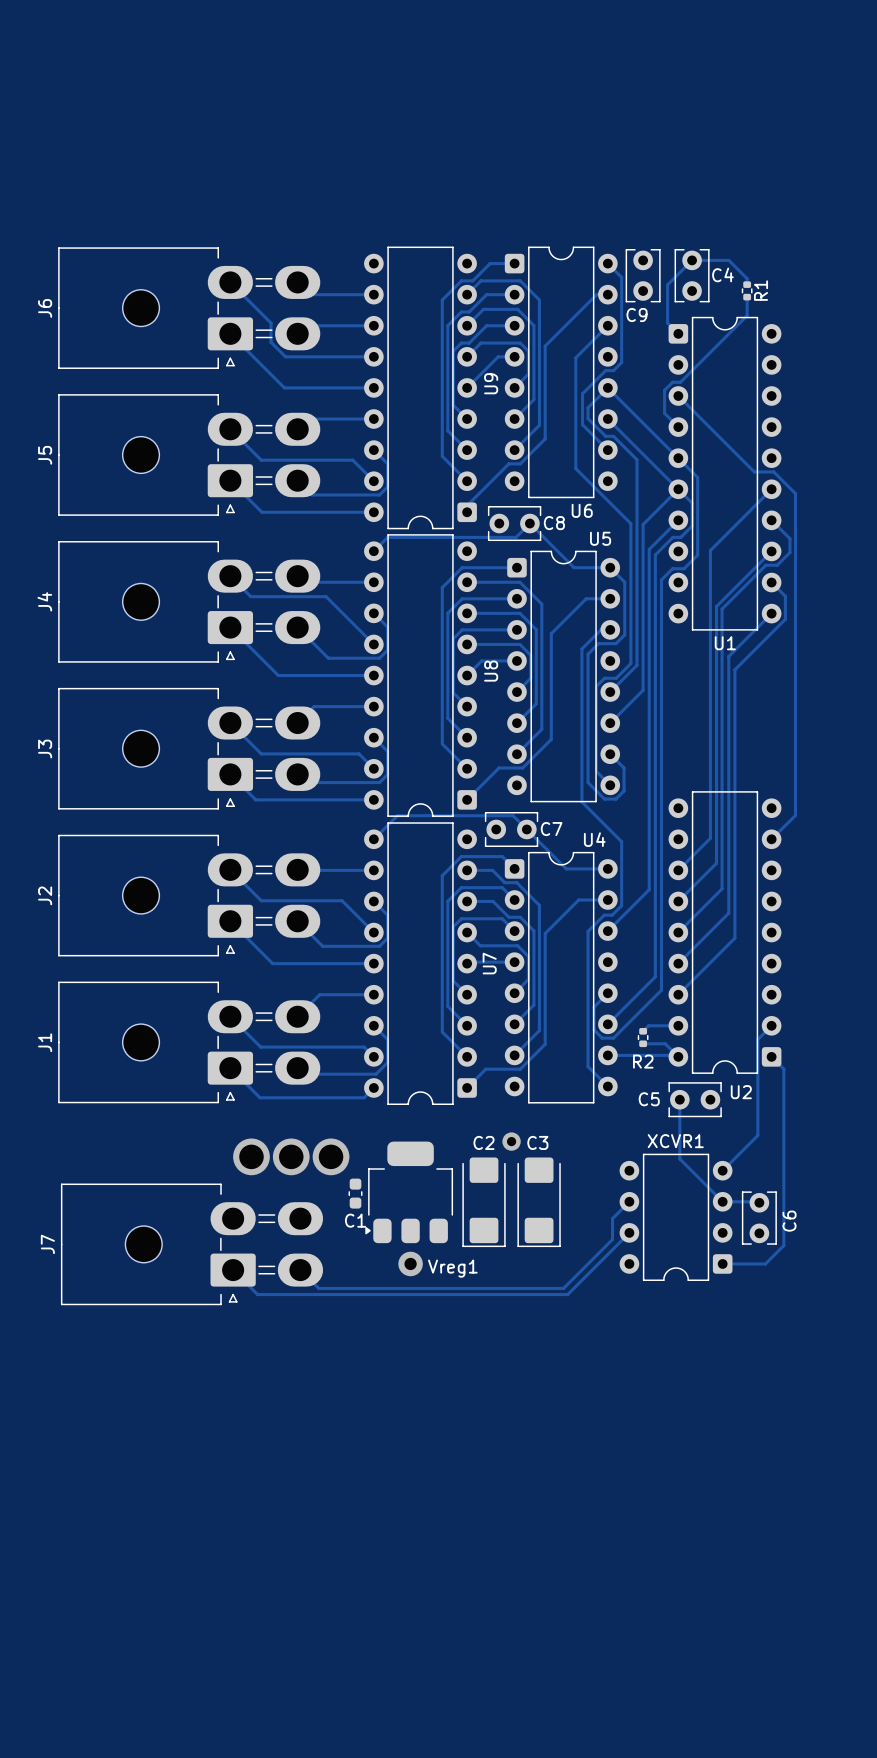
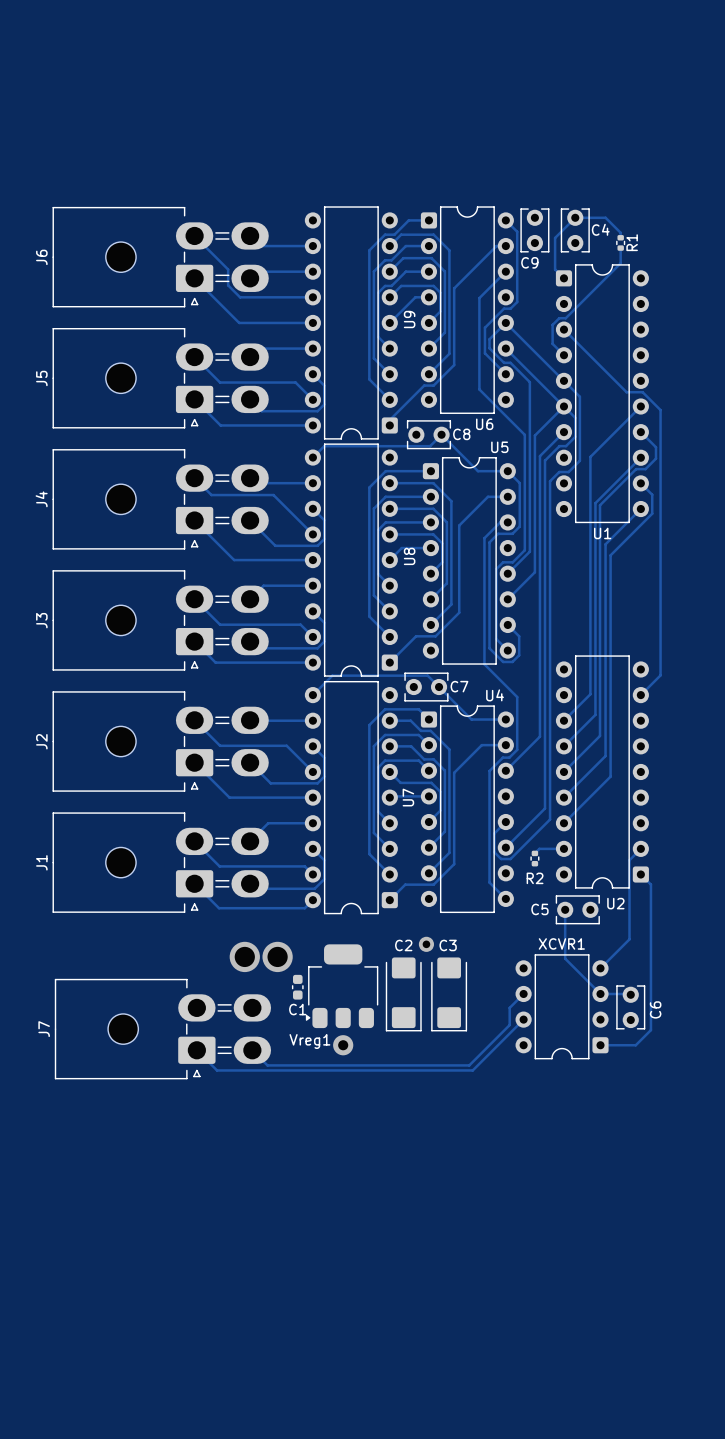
track: (643, 1043) (665, 1043) (678, 1056) -> none
track: (607, 1055) (676, 1055) -> none
via: (251, 1156) -> none
Vreg1 name position: Vreg1 (452, 1268) -> Vreg1 (309, 1041)

